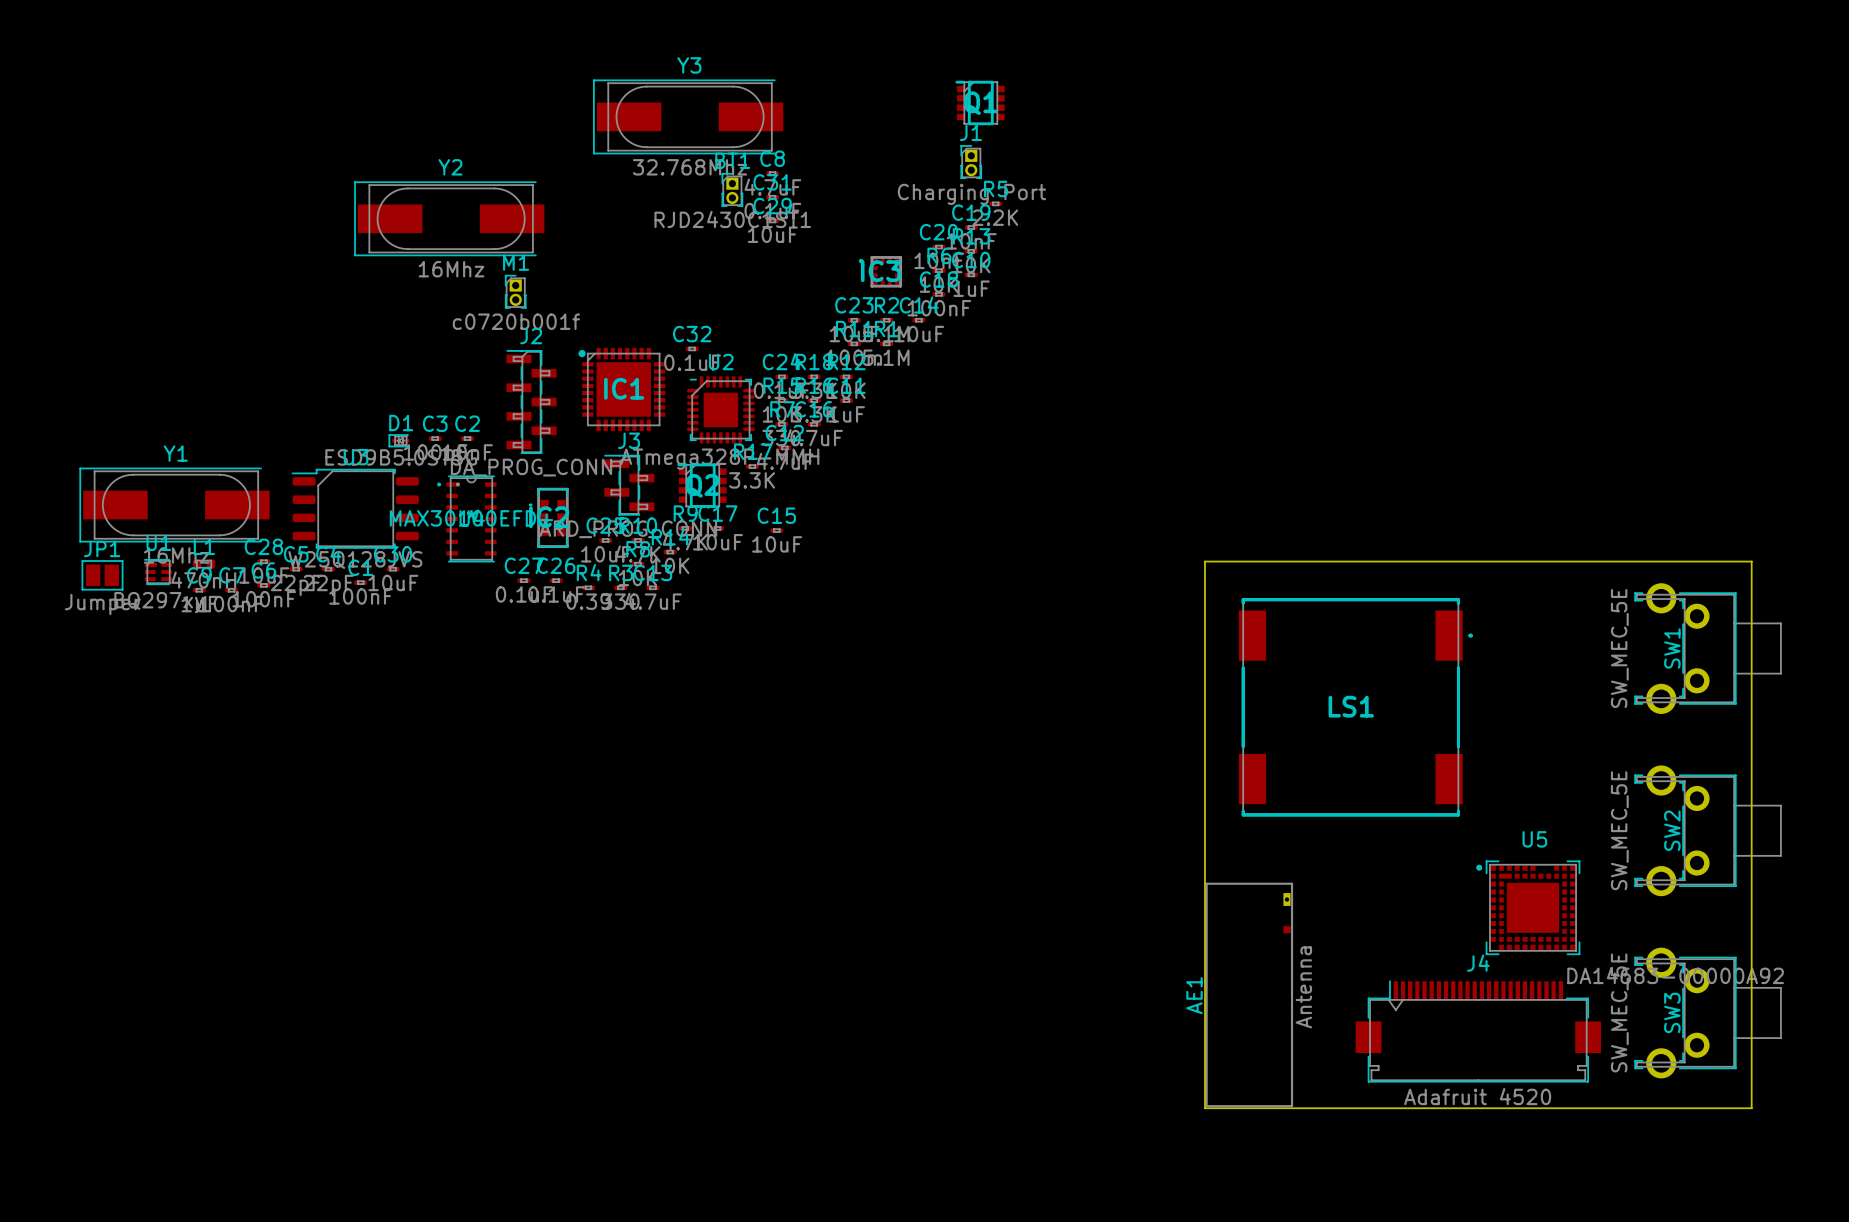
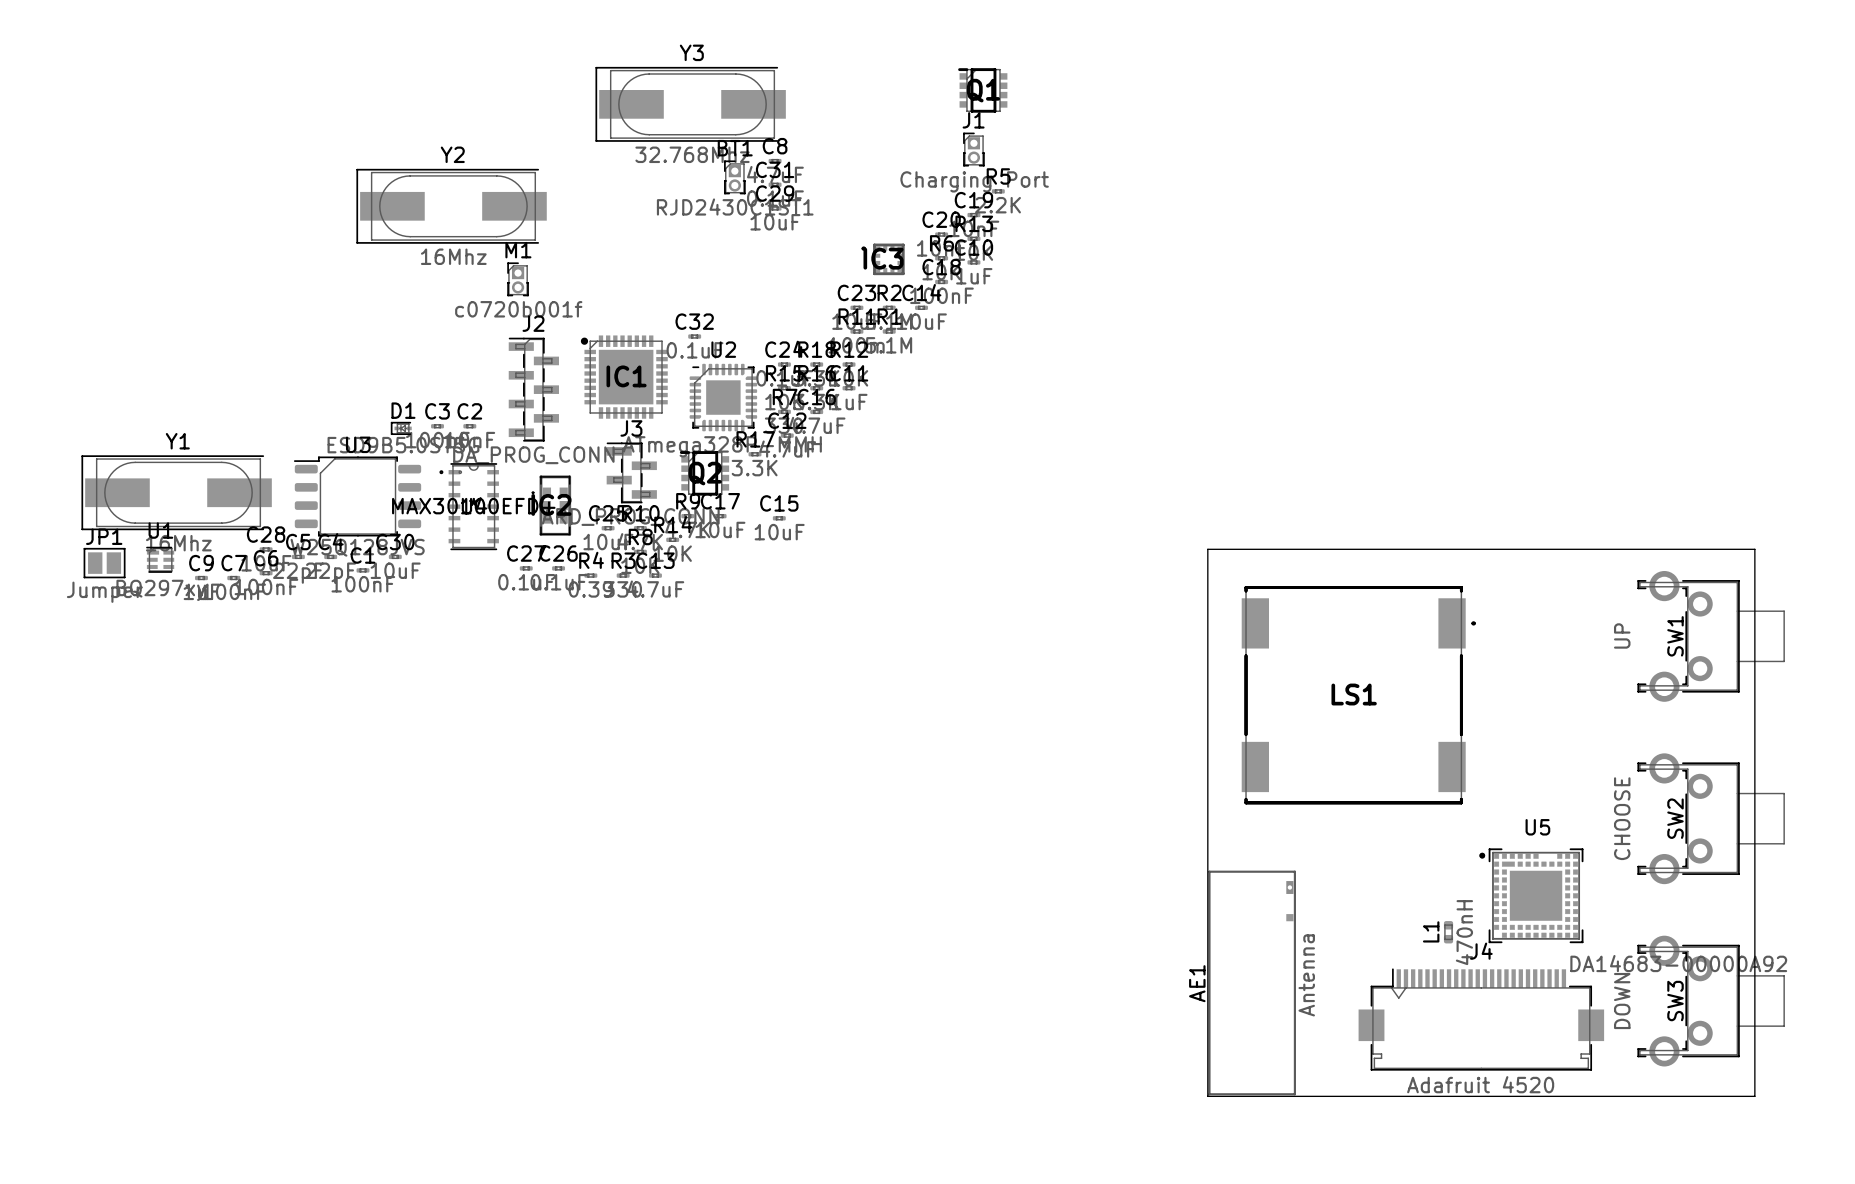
L1 rotation: 0° (204, 564) -> 90° clockwise (1448, 932)
L1 position: (204, 564) -> (1448, 932)
SW1 value: SW_MEC_5E (1619, 648) -> UP (1622, 635)
SW2 value: SW_MEC_5E (1619, 830) -> CHOOSE (1622, 818)
SW3 value: SW_MEC_5E (1619, 1012) -> DOWN (1622, 1001)

